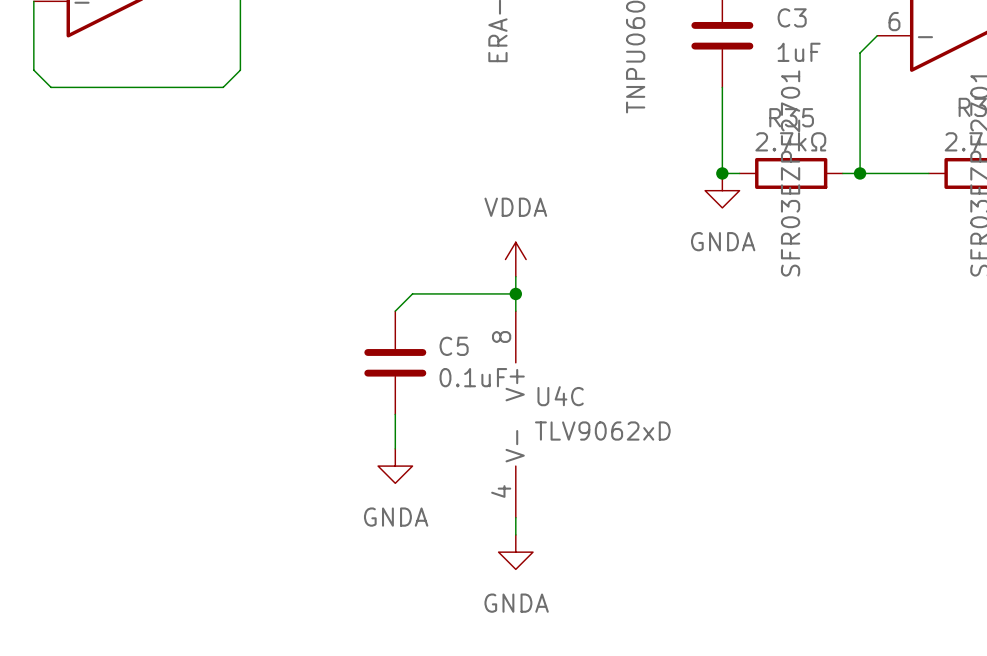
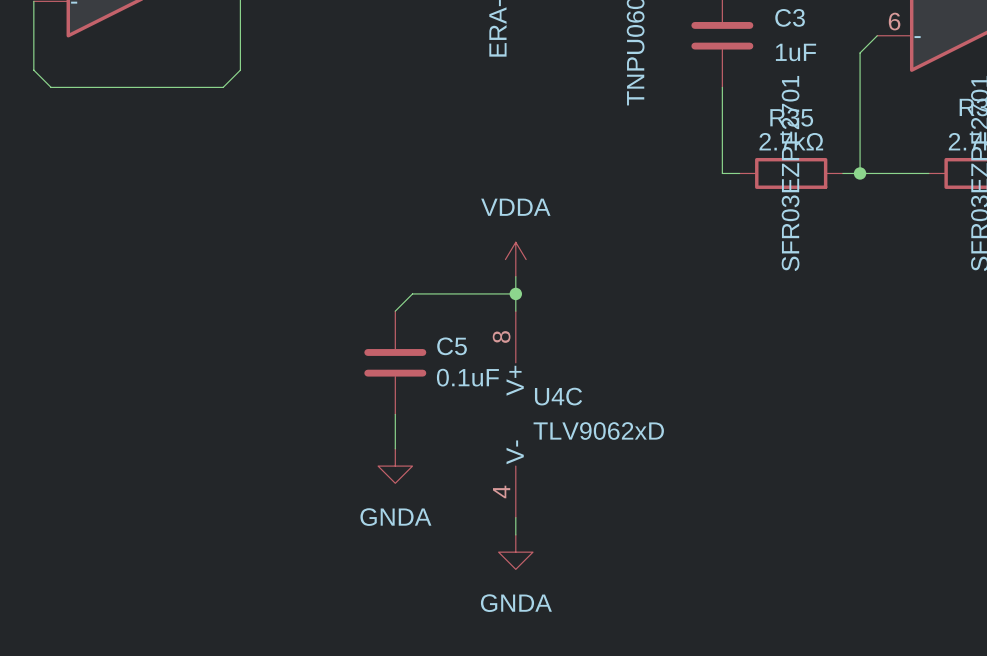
junction: (722, 173) -> none
power symbol: GNDA (722, 190) -> none

